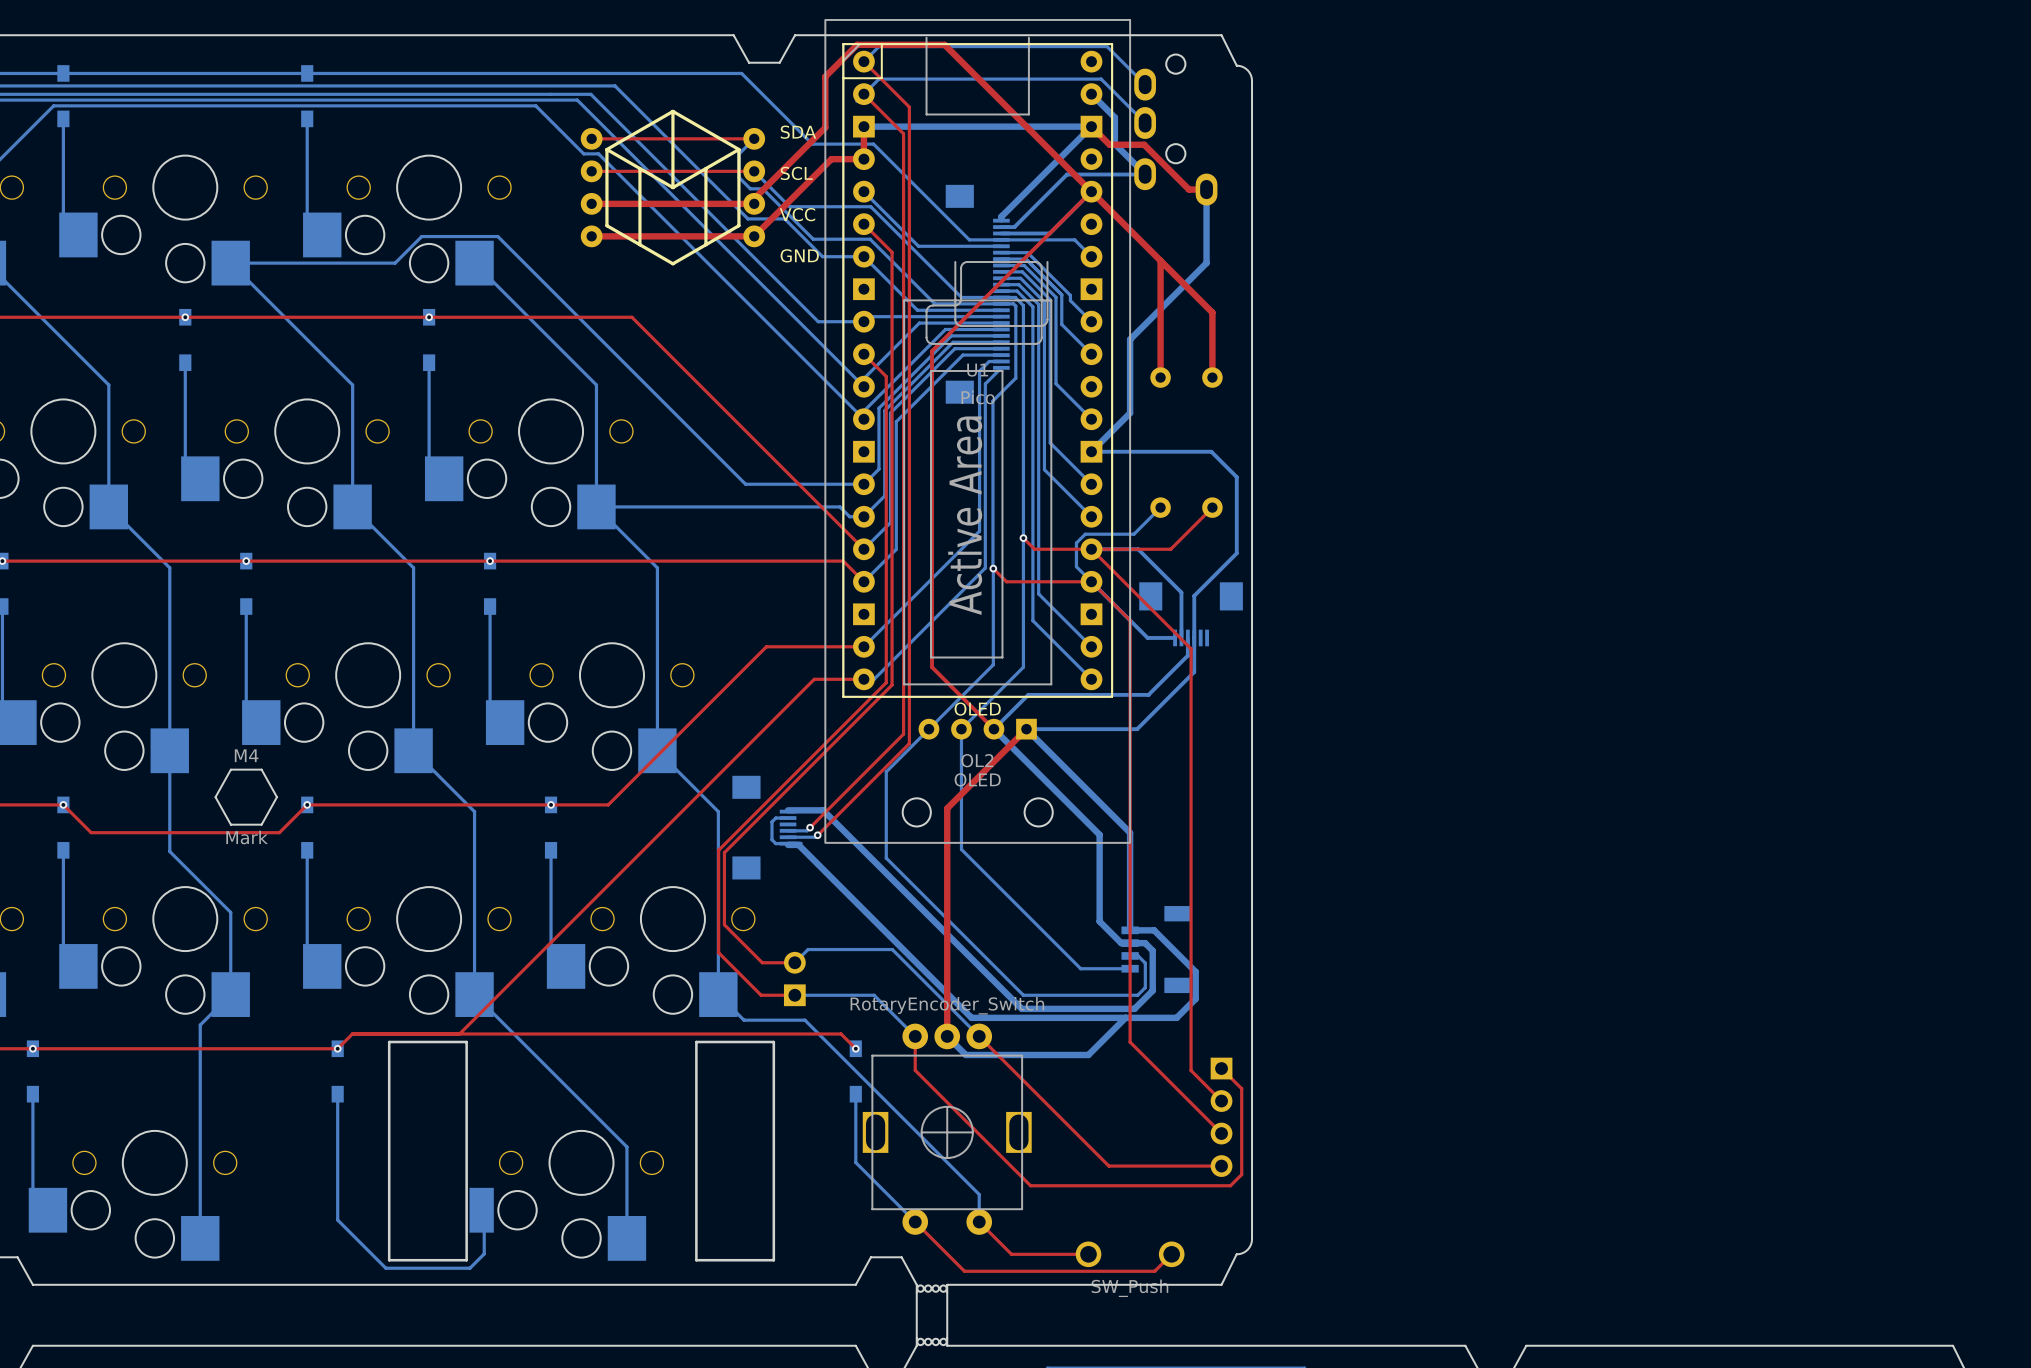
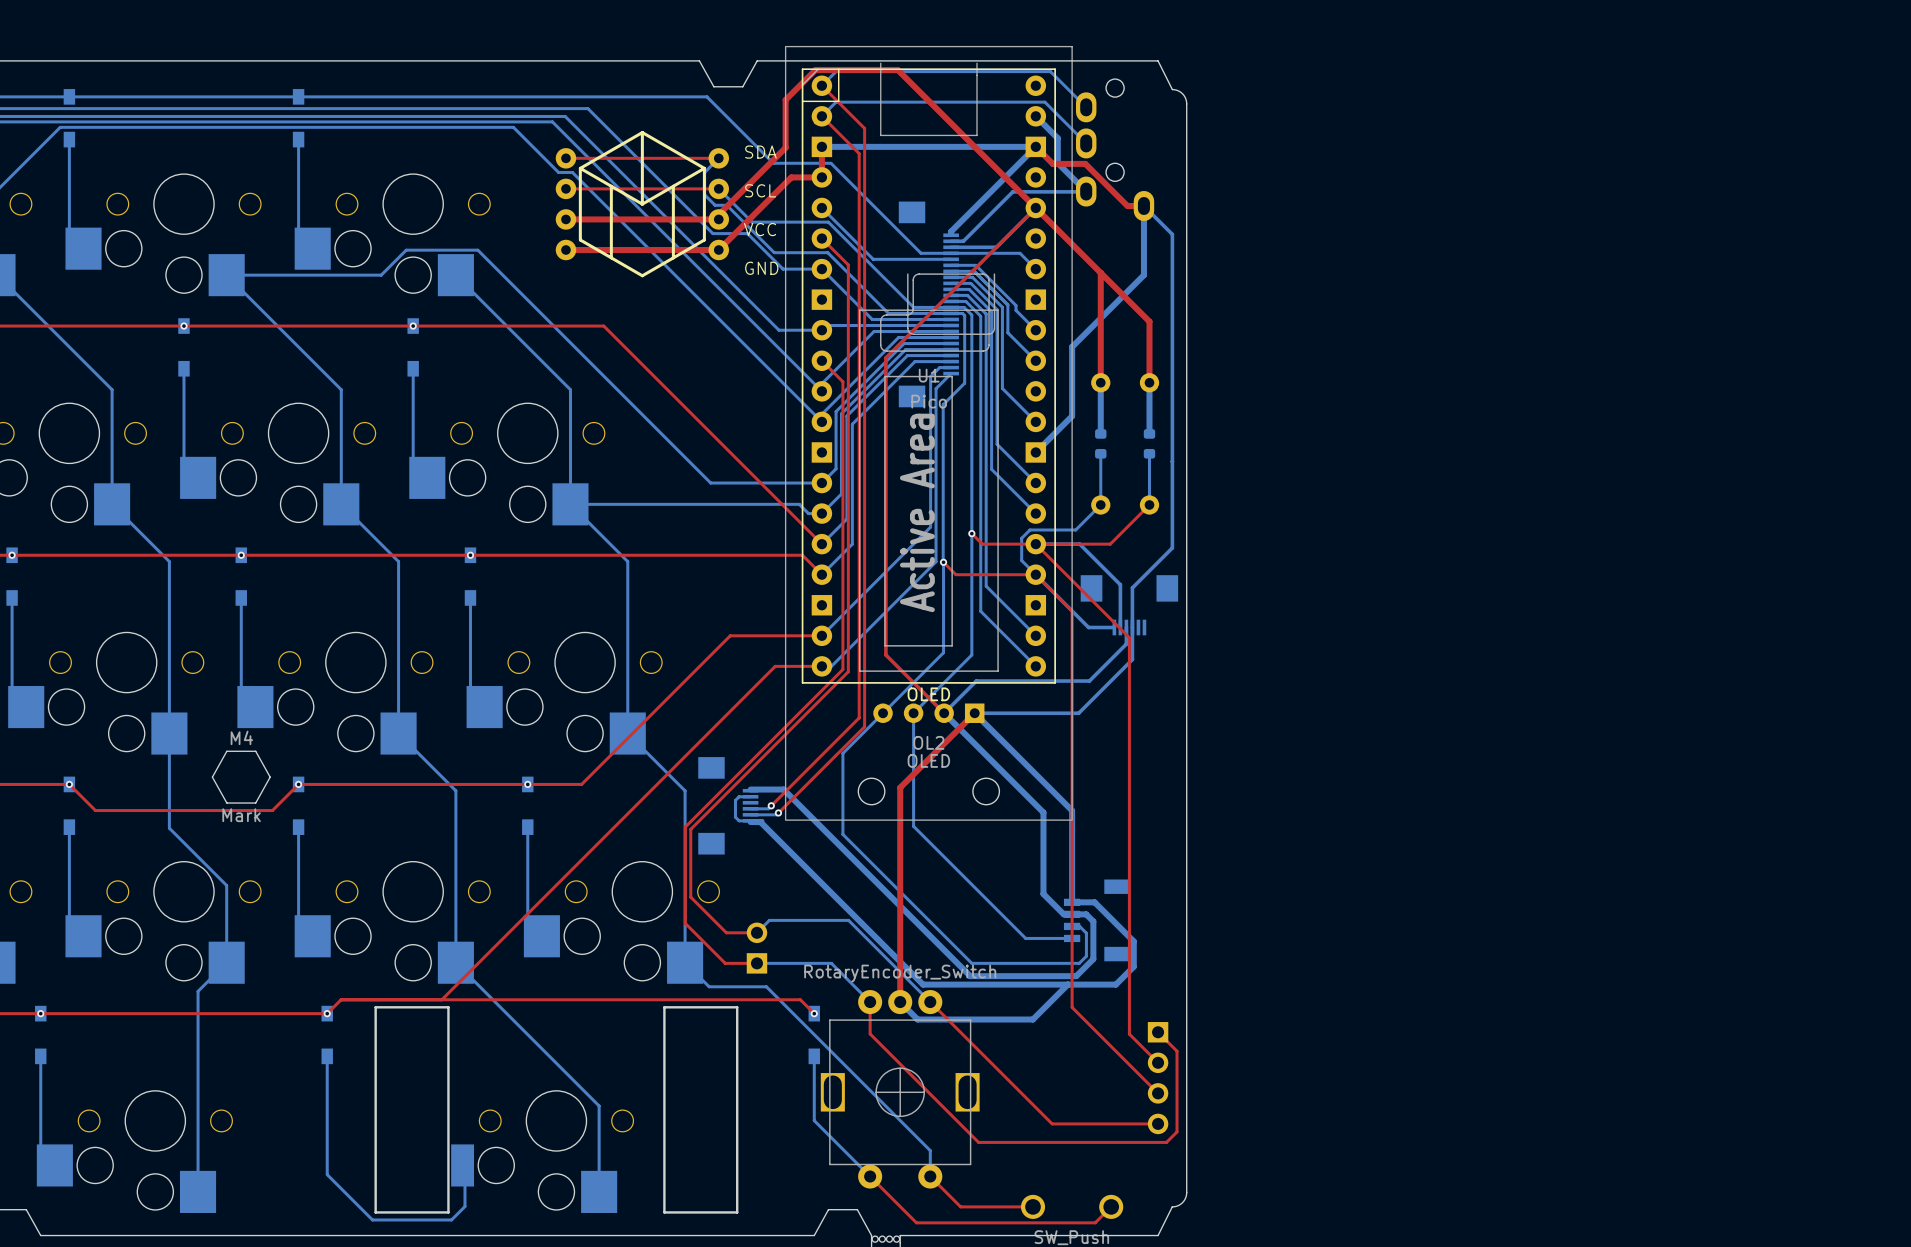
bottom track: none -> (1100, 382) (1100, 433)
bottom track: none -> (1149, 382) (1149, 433)
part: none -> (1100, 443)
part: none -> (1149, 443)
bottom track: (1091, 451) (1211, 451) (1236, 477) -> (1143, 205) (1172, 234) (1172, 476)
bottom track: none -> (1100, 453) (1100, 504)
bottom track: none -> (1149, 453) (1149, 504)

